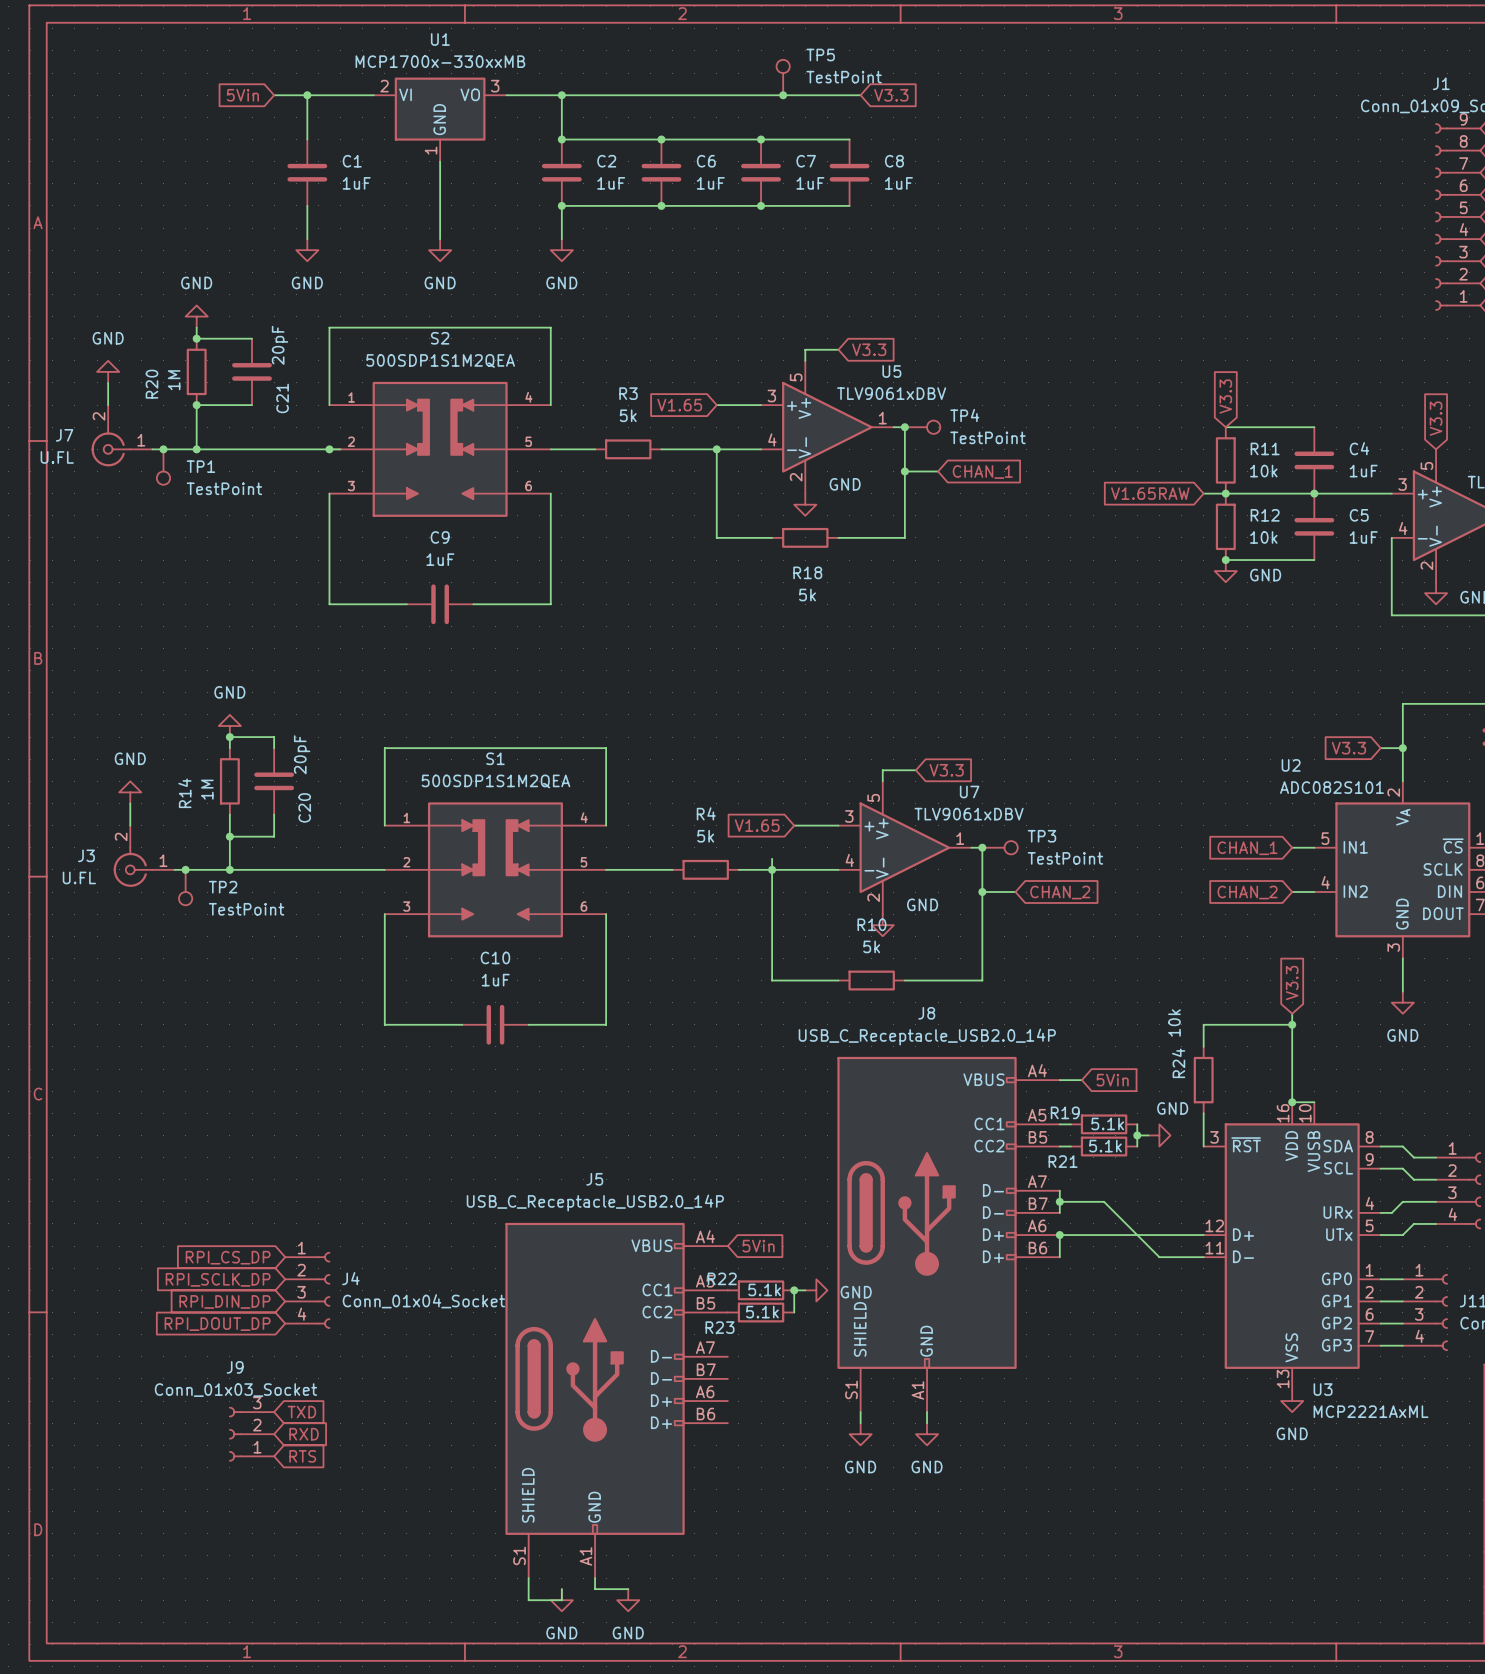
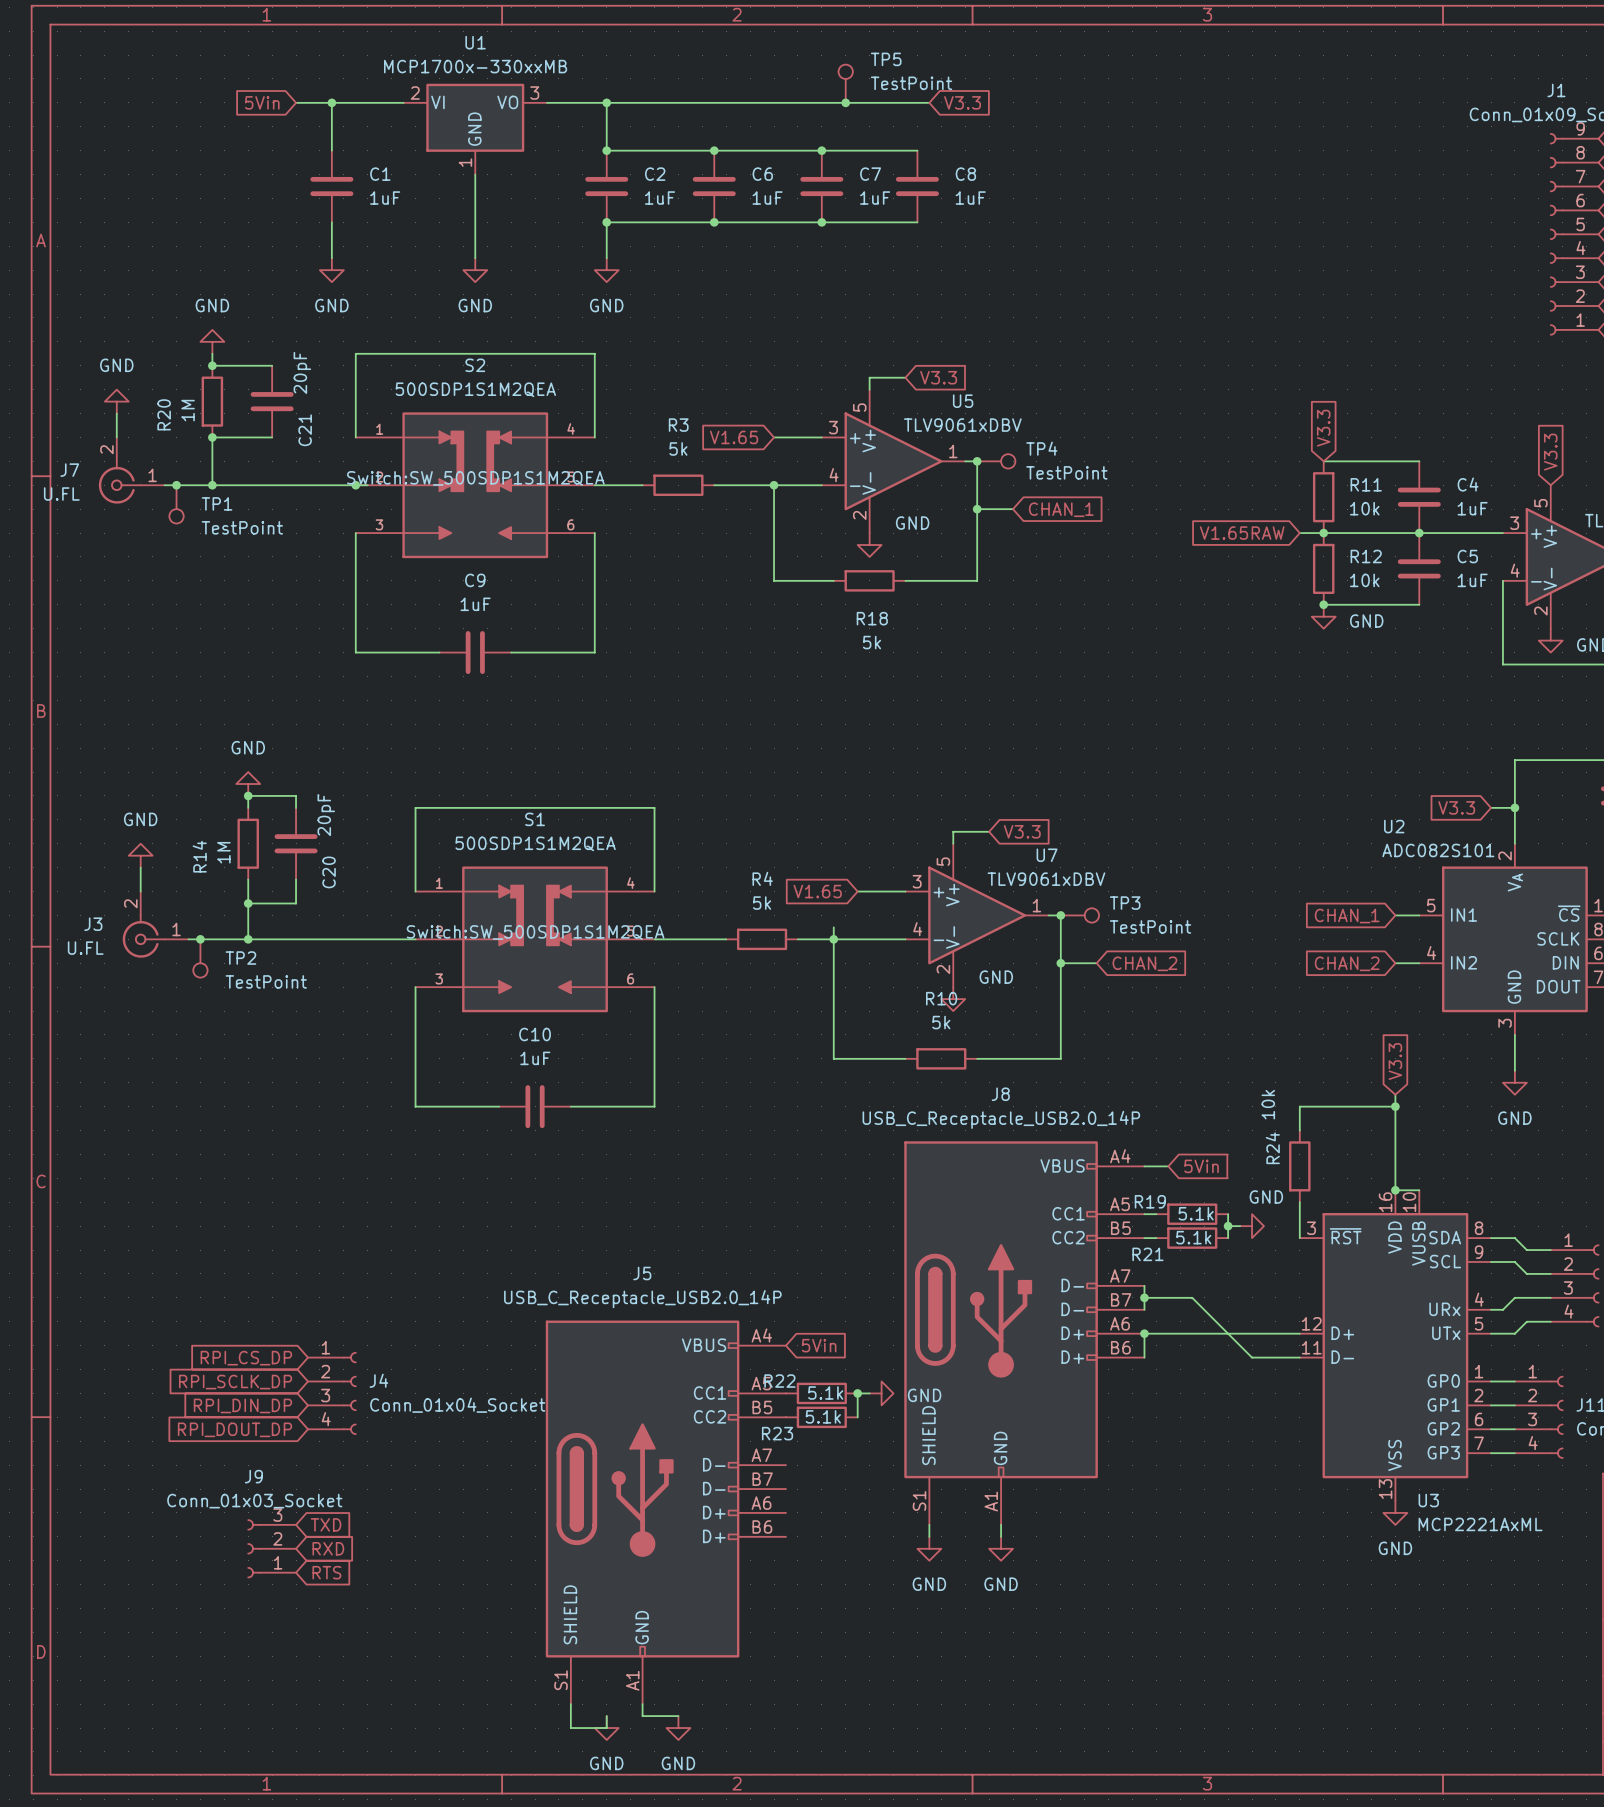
S2 text: none -> Switch:SW_500SDP1S1M2QEA (475, 478)
S1 text: none -> Switch:SW_500SDP1S1M2QEA (535, 932)

